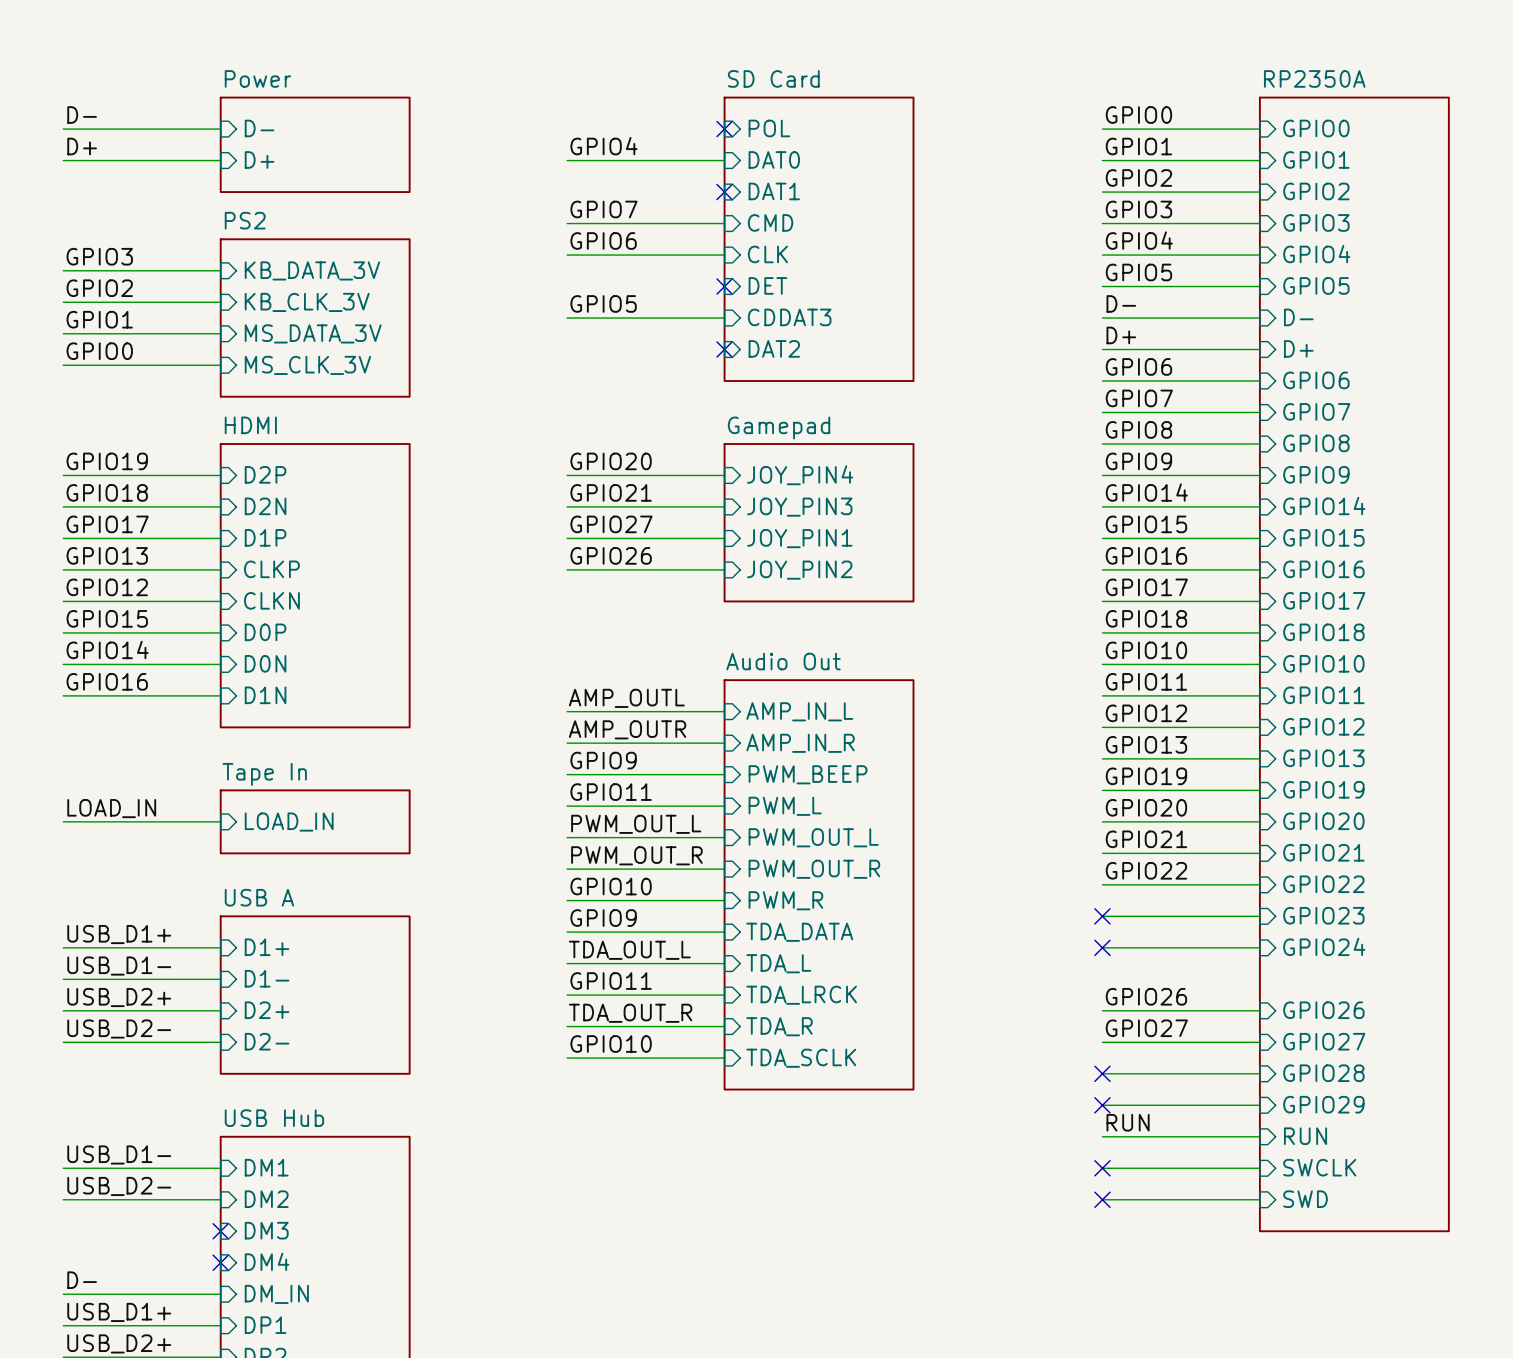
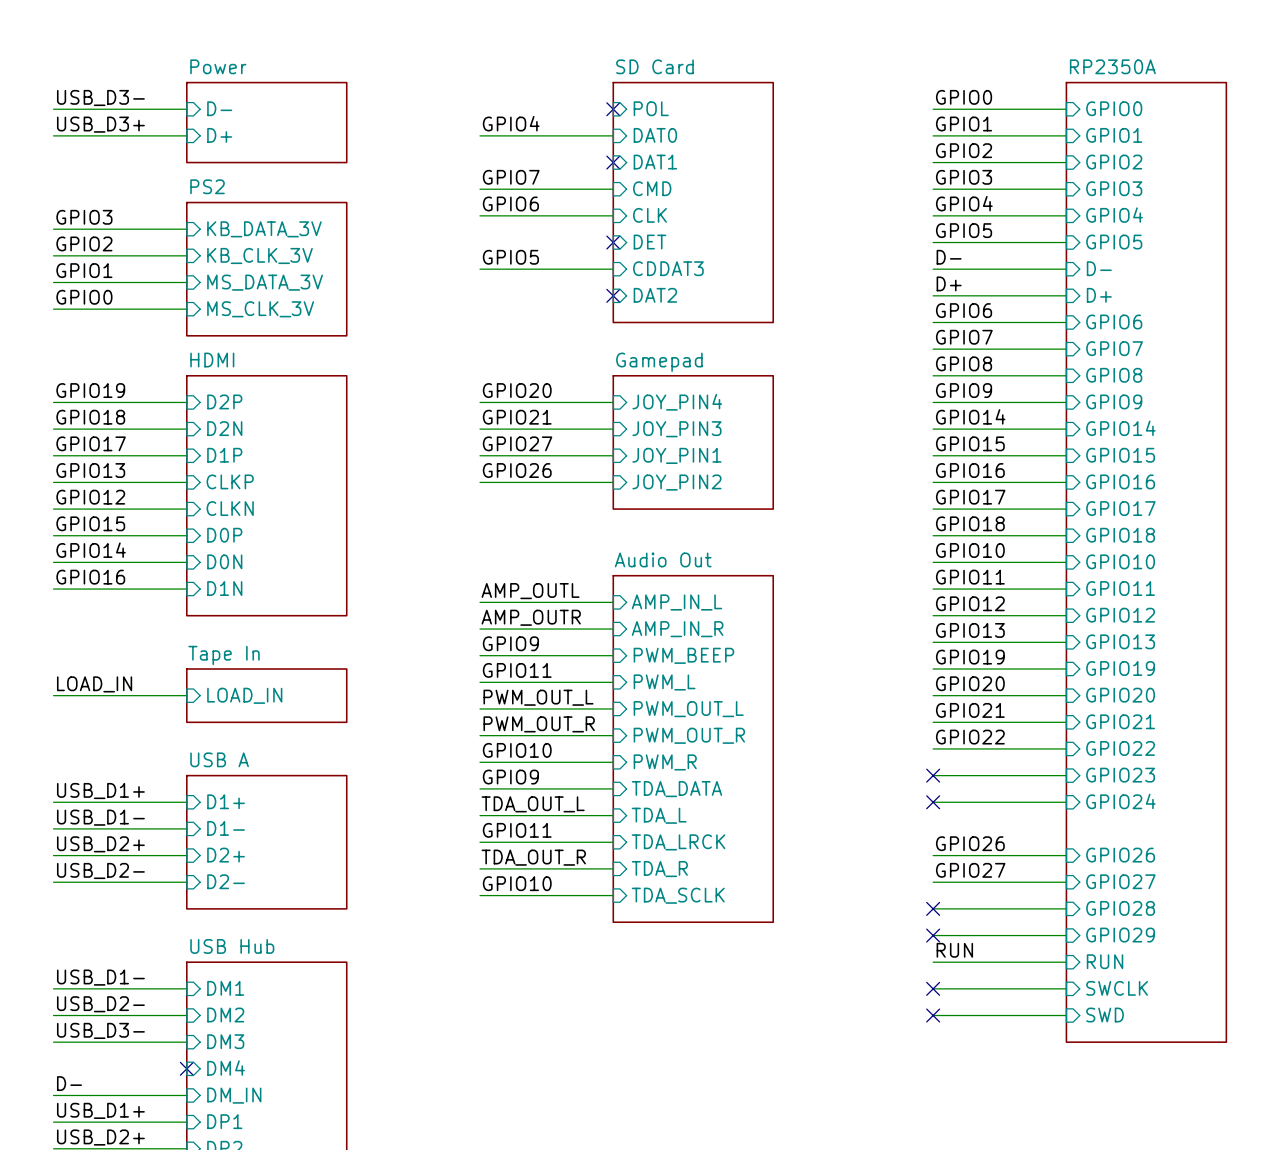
label: D- (82, 115) -> USB_D3- (100, 97)
label: D+ (82, 146) -> USB_D3+ (100, 124)
label: none -> USB_D3- (100, 1030)
wire: none -> (53, 1042) (186, 1042)
no-connect mark: (220, 1231) -> none

